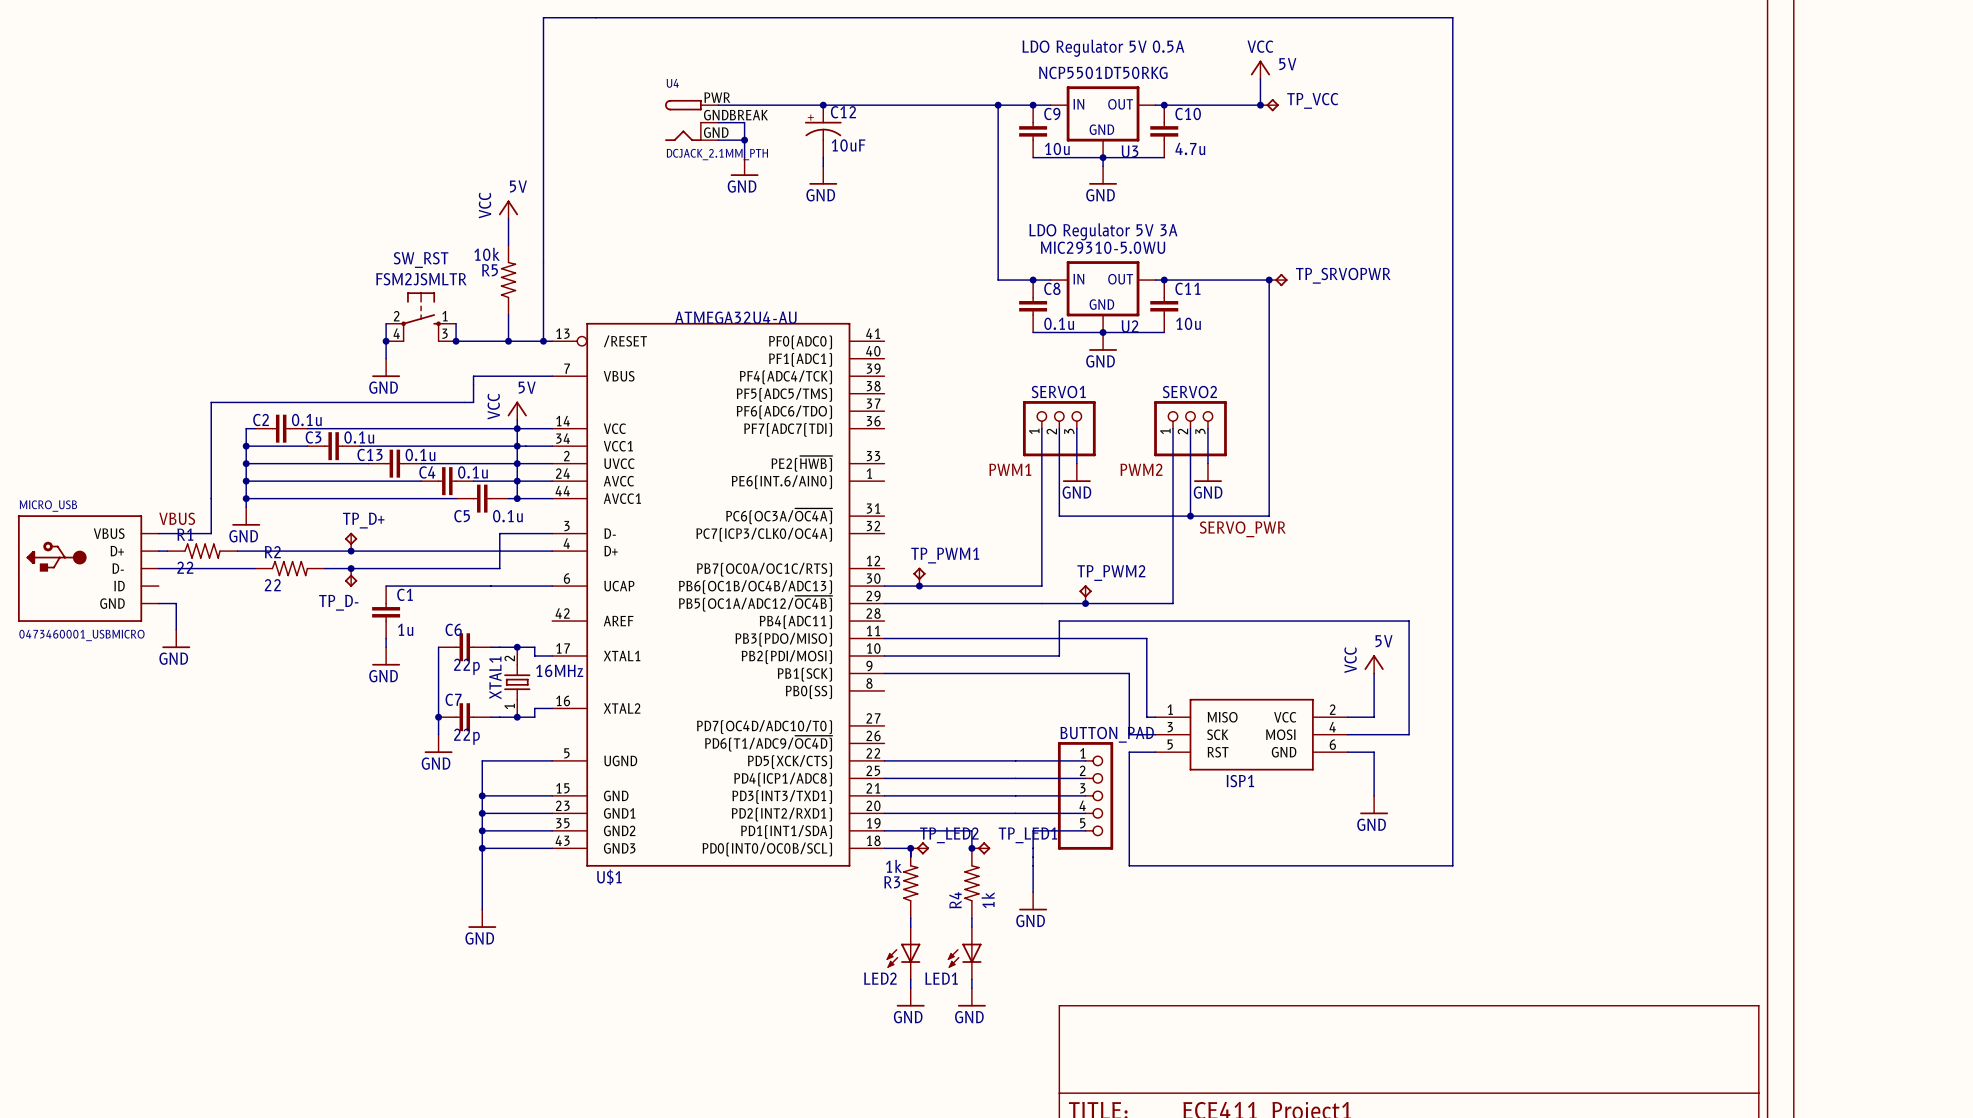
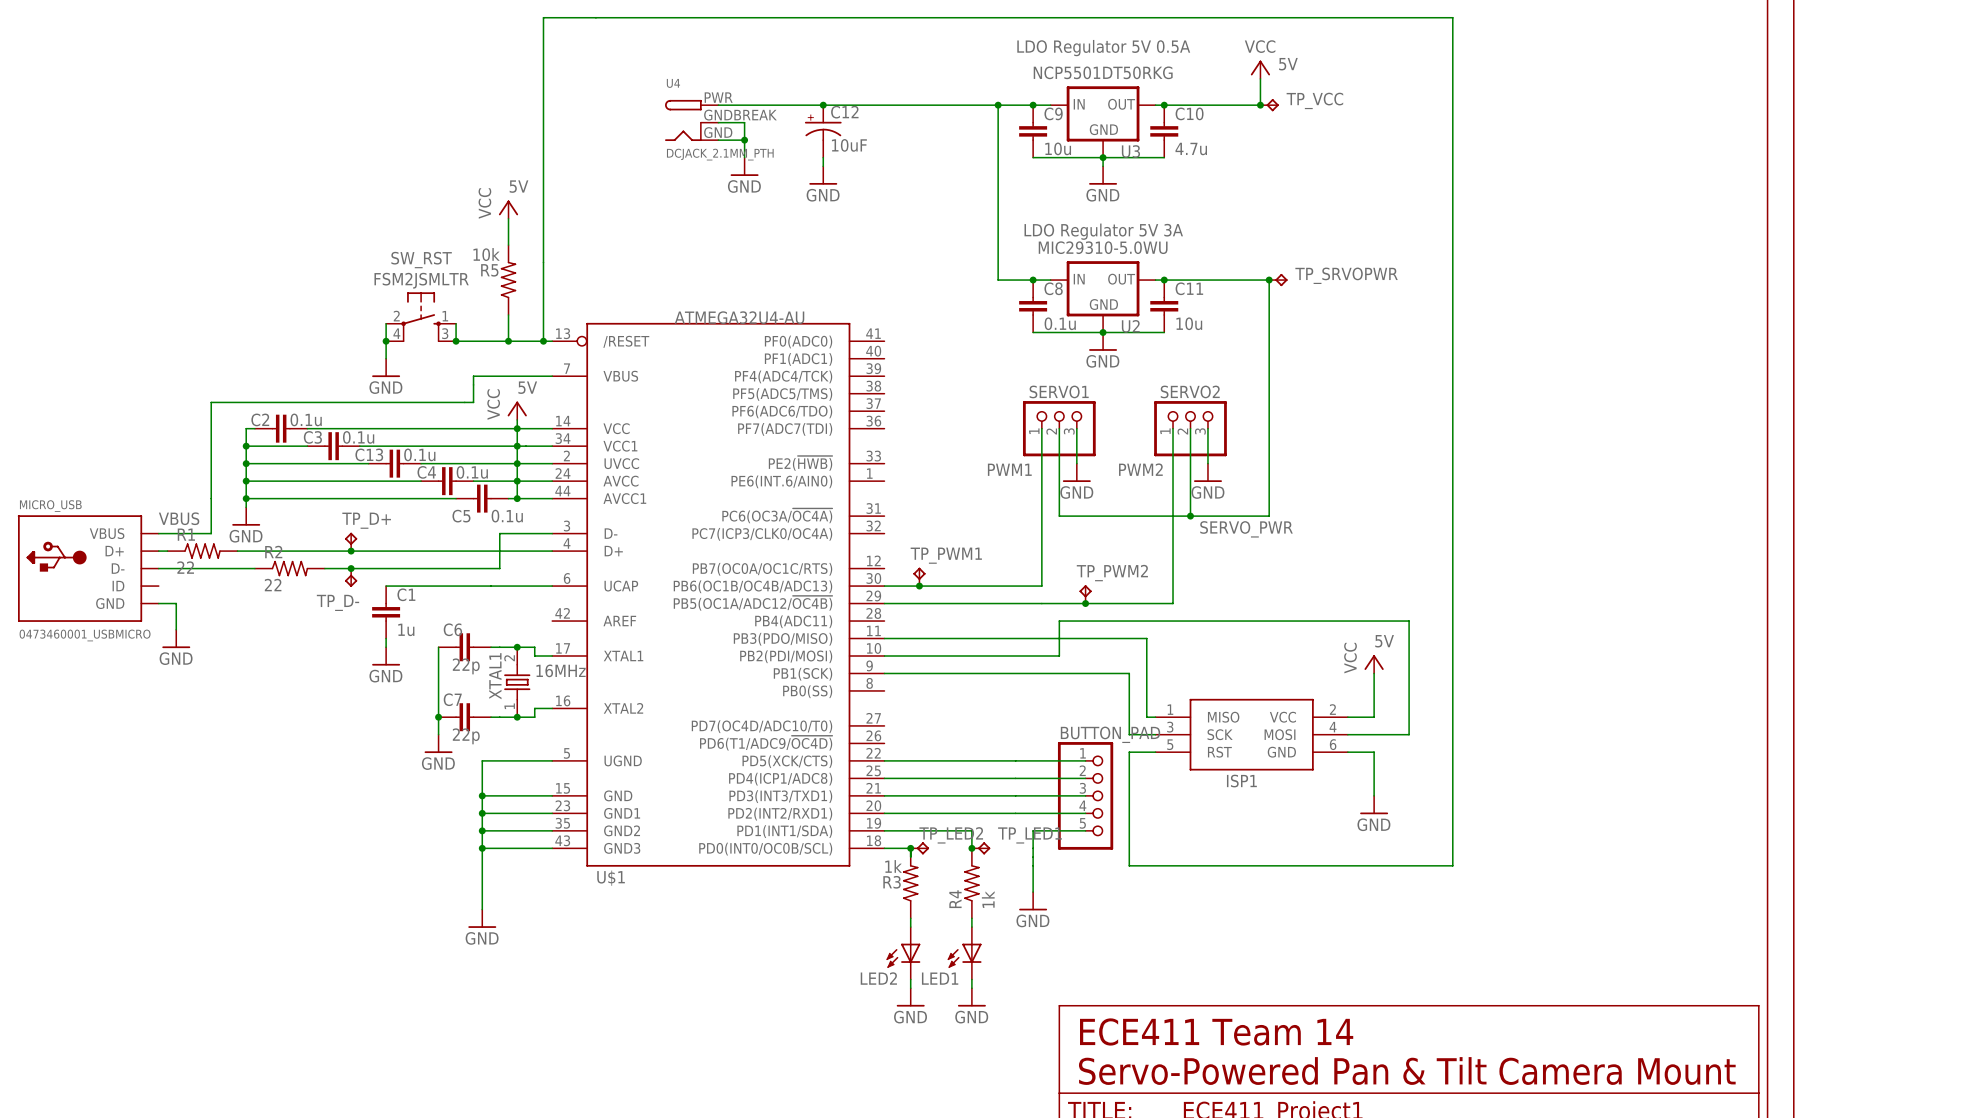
text: none -> ECE411 Team 14 (1216, 1031)
text: none -> Servo-Powered Pan & Tilt Camera Mount (1407, 1071)

